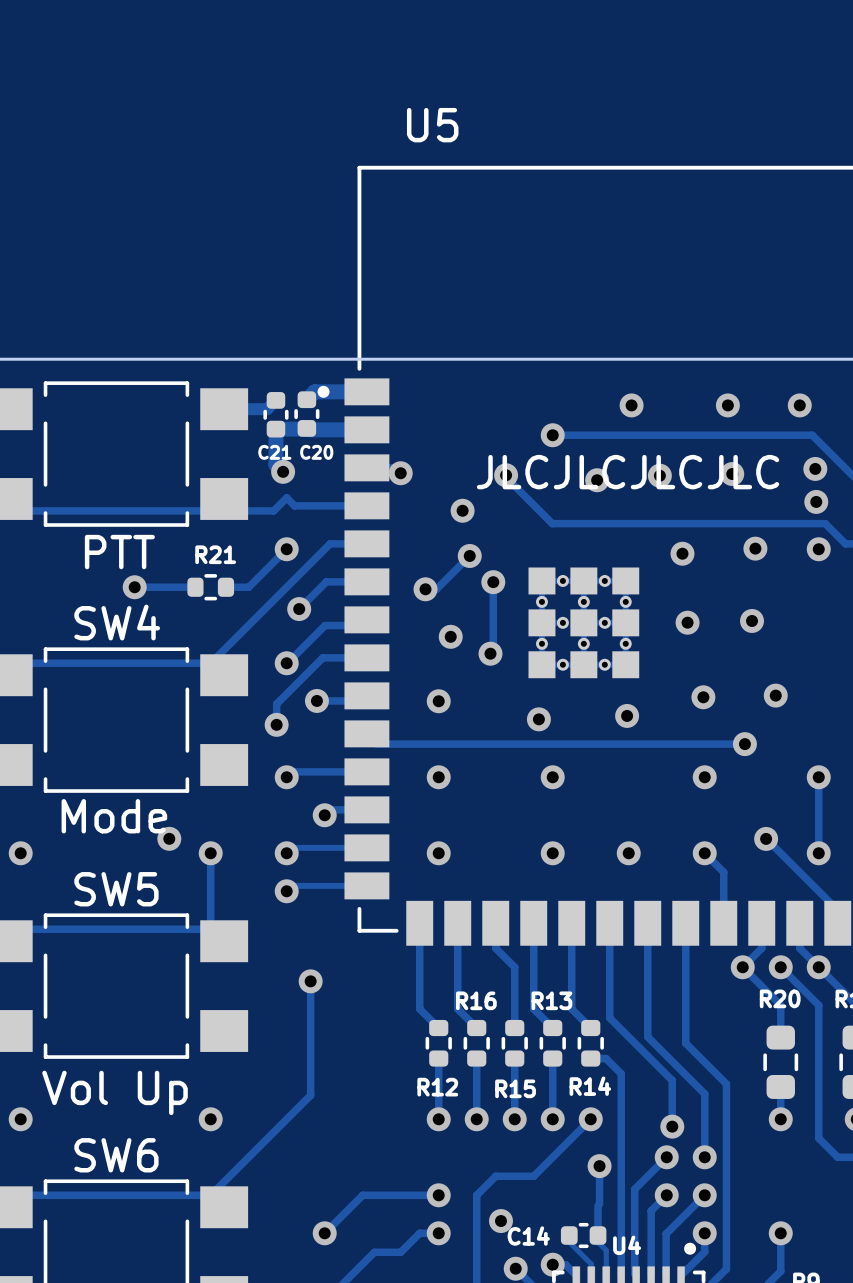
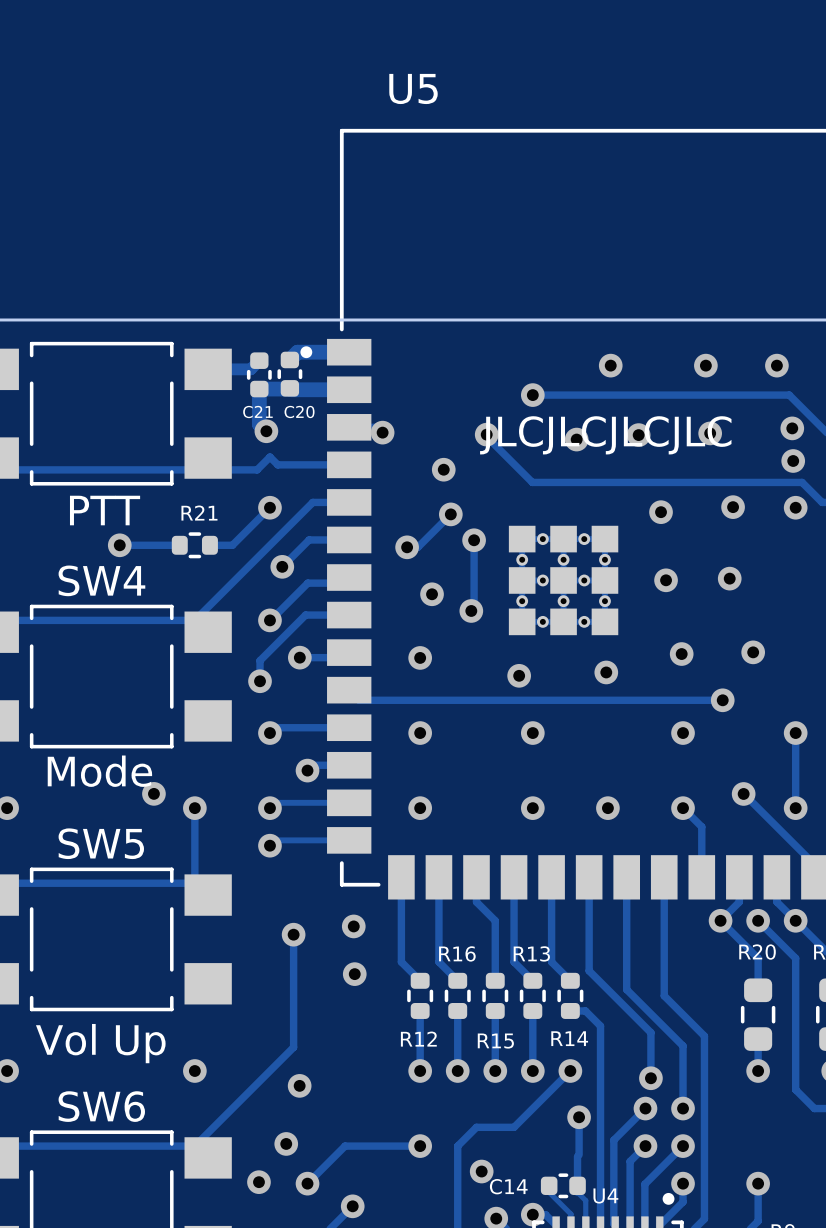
via: none -> (353, 926)
via: none -> (354, 974)
via: none -> (299, 1085)
via: none -> (286, 1143)
via: none -> (258, 1182)
track: (438, 1233) (419, 1233) (400, 1252) (374, 1252) (370, 1256) -> none
via: (438, 1233) -> none
via: none -> (352, 1206)

